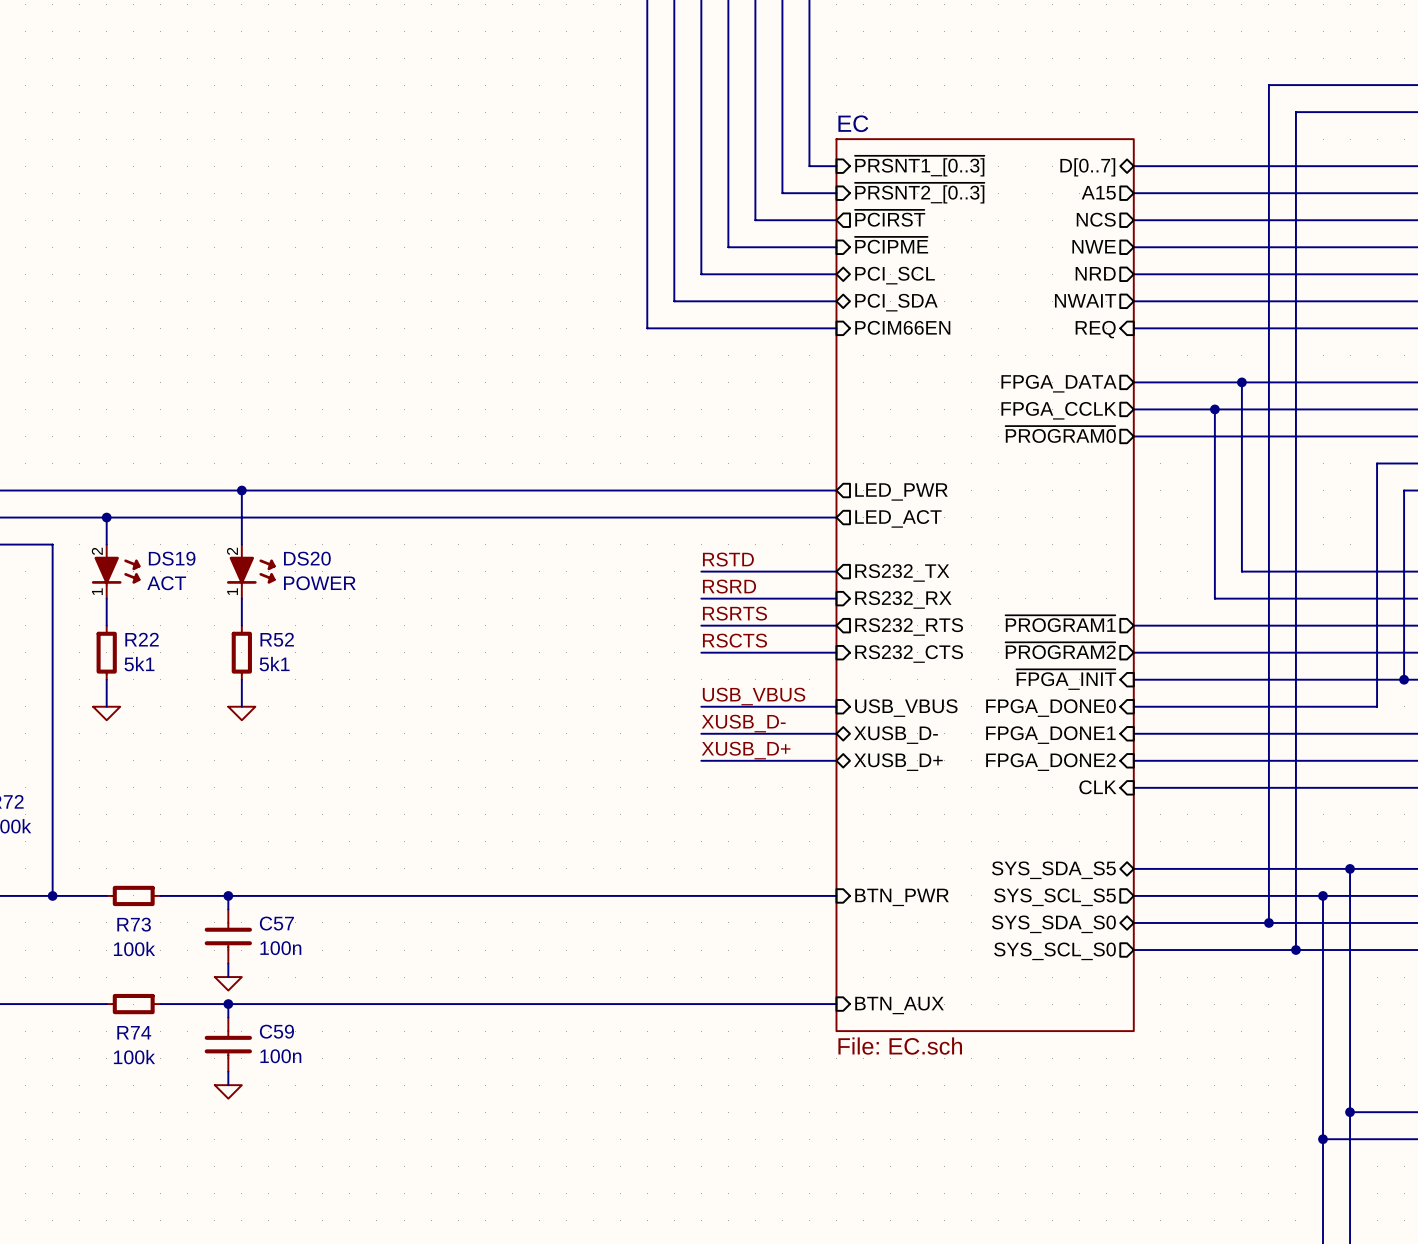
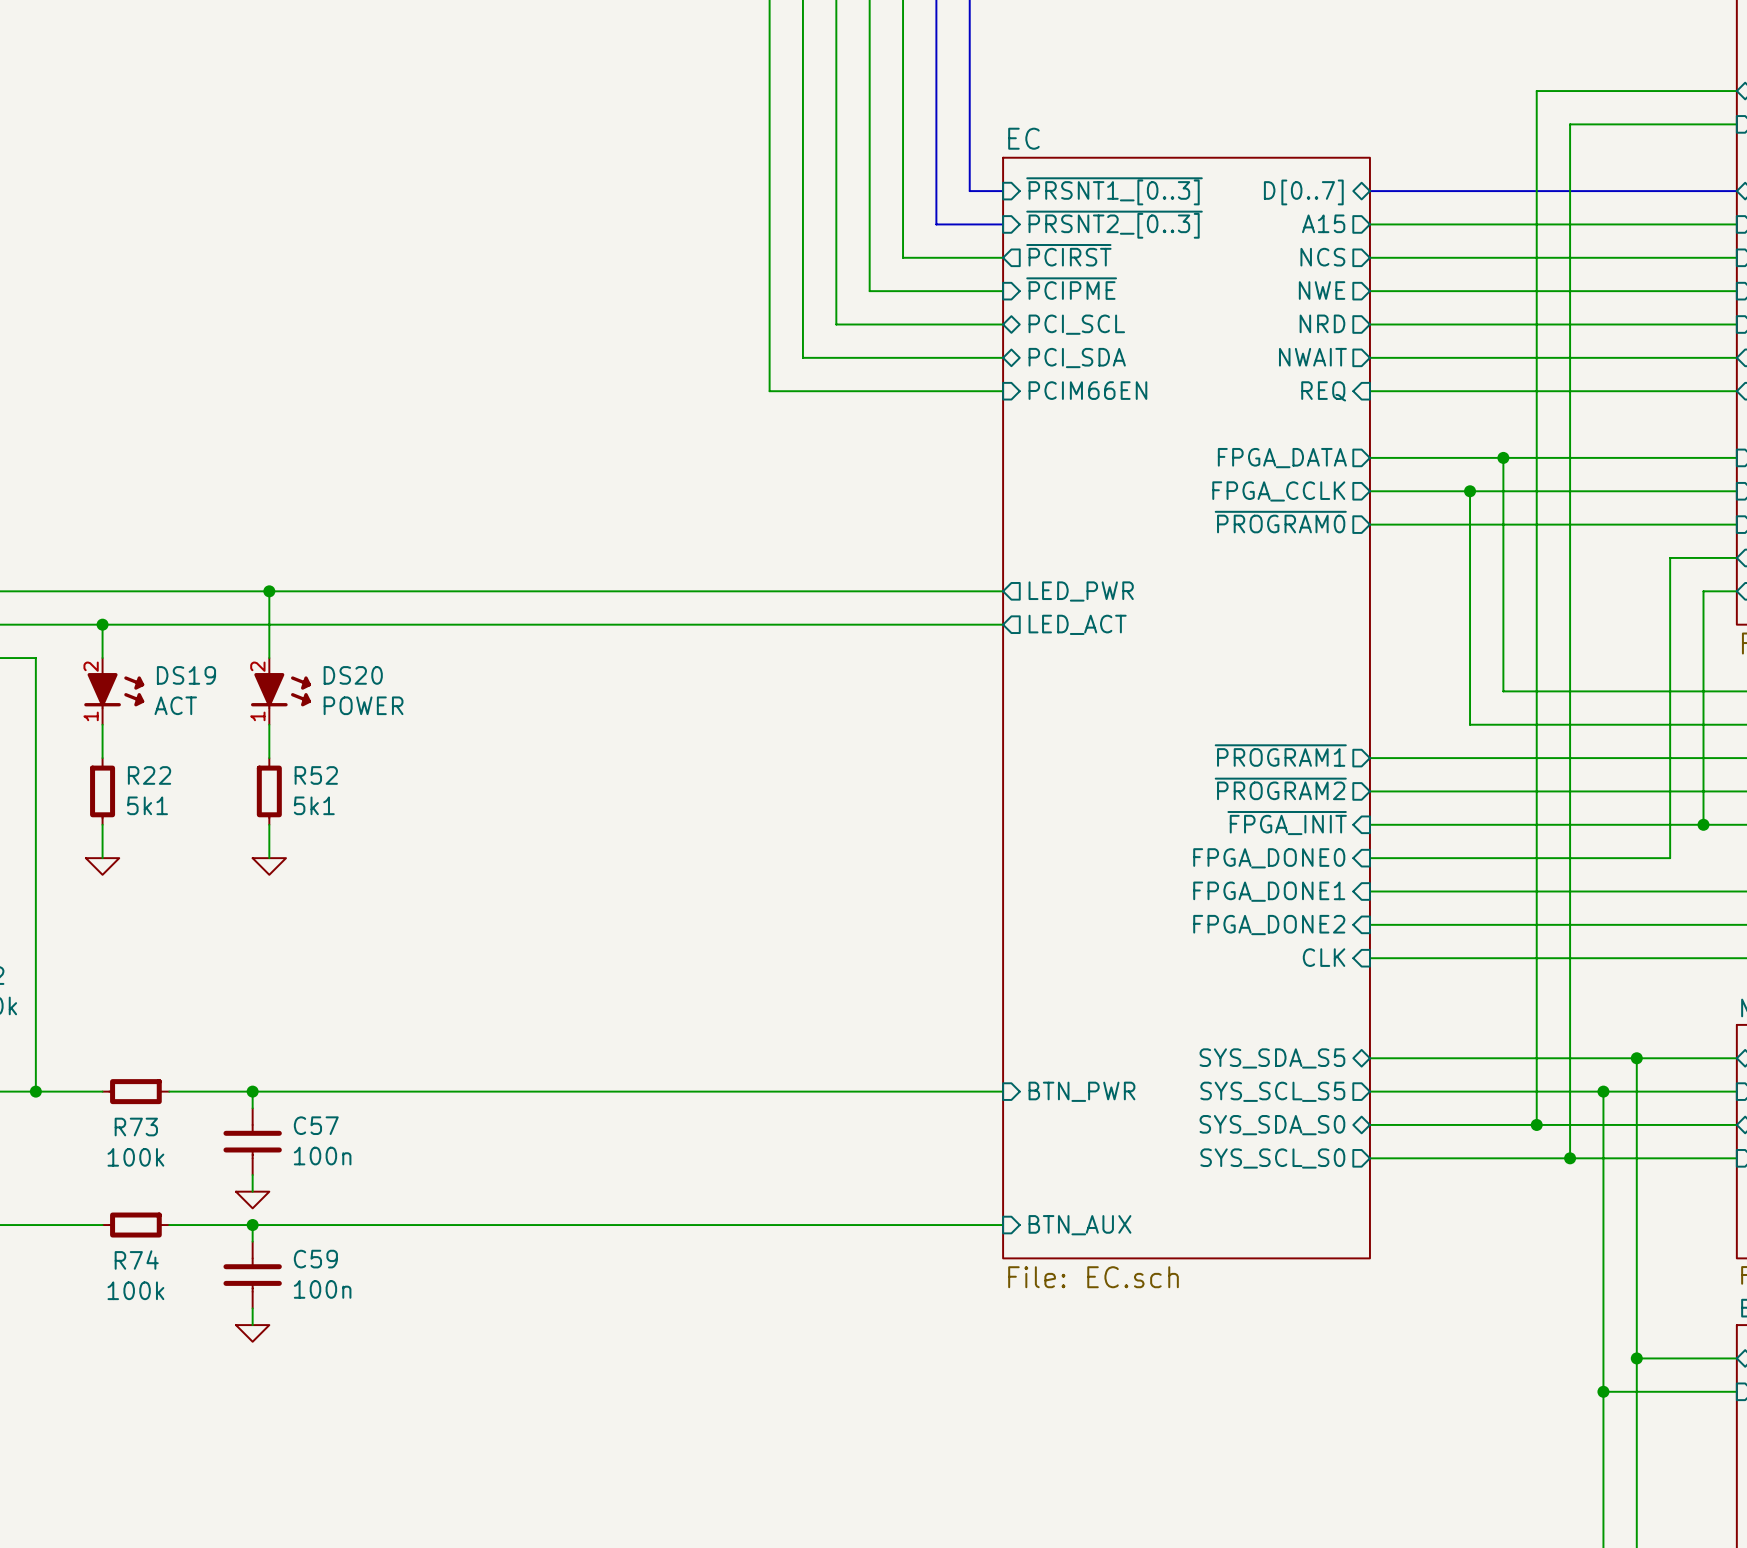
label: RSTD (728, 559) -> none
wire: (701, 571) (836, 571) -> none
sheet pin: RS232_TX (902, 572) -> none
label: RSRD (729, 586) -> none
wire: (701, 598) (836, 598) -> none
sheet pin: RS232_RX (903, 599) -> none
label: RSRTS (734, 613) -> none
wire: (701, 625) (836, 625) -> none
sheet pin: RS232_RTS (909, 627) -> none
label: RSCTS (734, 640) -> none
wire: (701, 652) (836, 652) -> none
sheet pin: RS232_CTS (909, 654) -> none
label: USB_VBUS (754, 696) -> none
wire: (701, 706) (836, 706) -> none
sheet pin: USB_VBUS (906, 708) -> none
label: XUSB_D- (743, 723) -> none
wire: (701, 733) (836, 733) -> none
sheet pin: XUSB_D- (896, 735) -> none
label: XUSB_D+ (746, 750) -> none
wire: (701, 760) (836, 760) -> none
sheet pin: XUSB_D+ (898, 762) -> none

